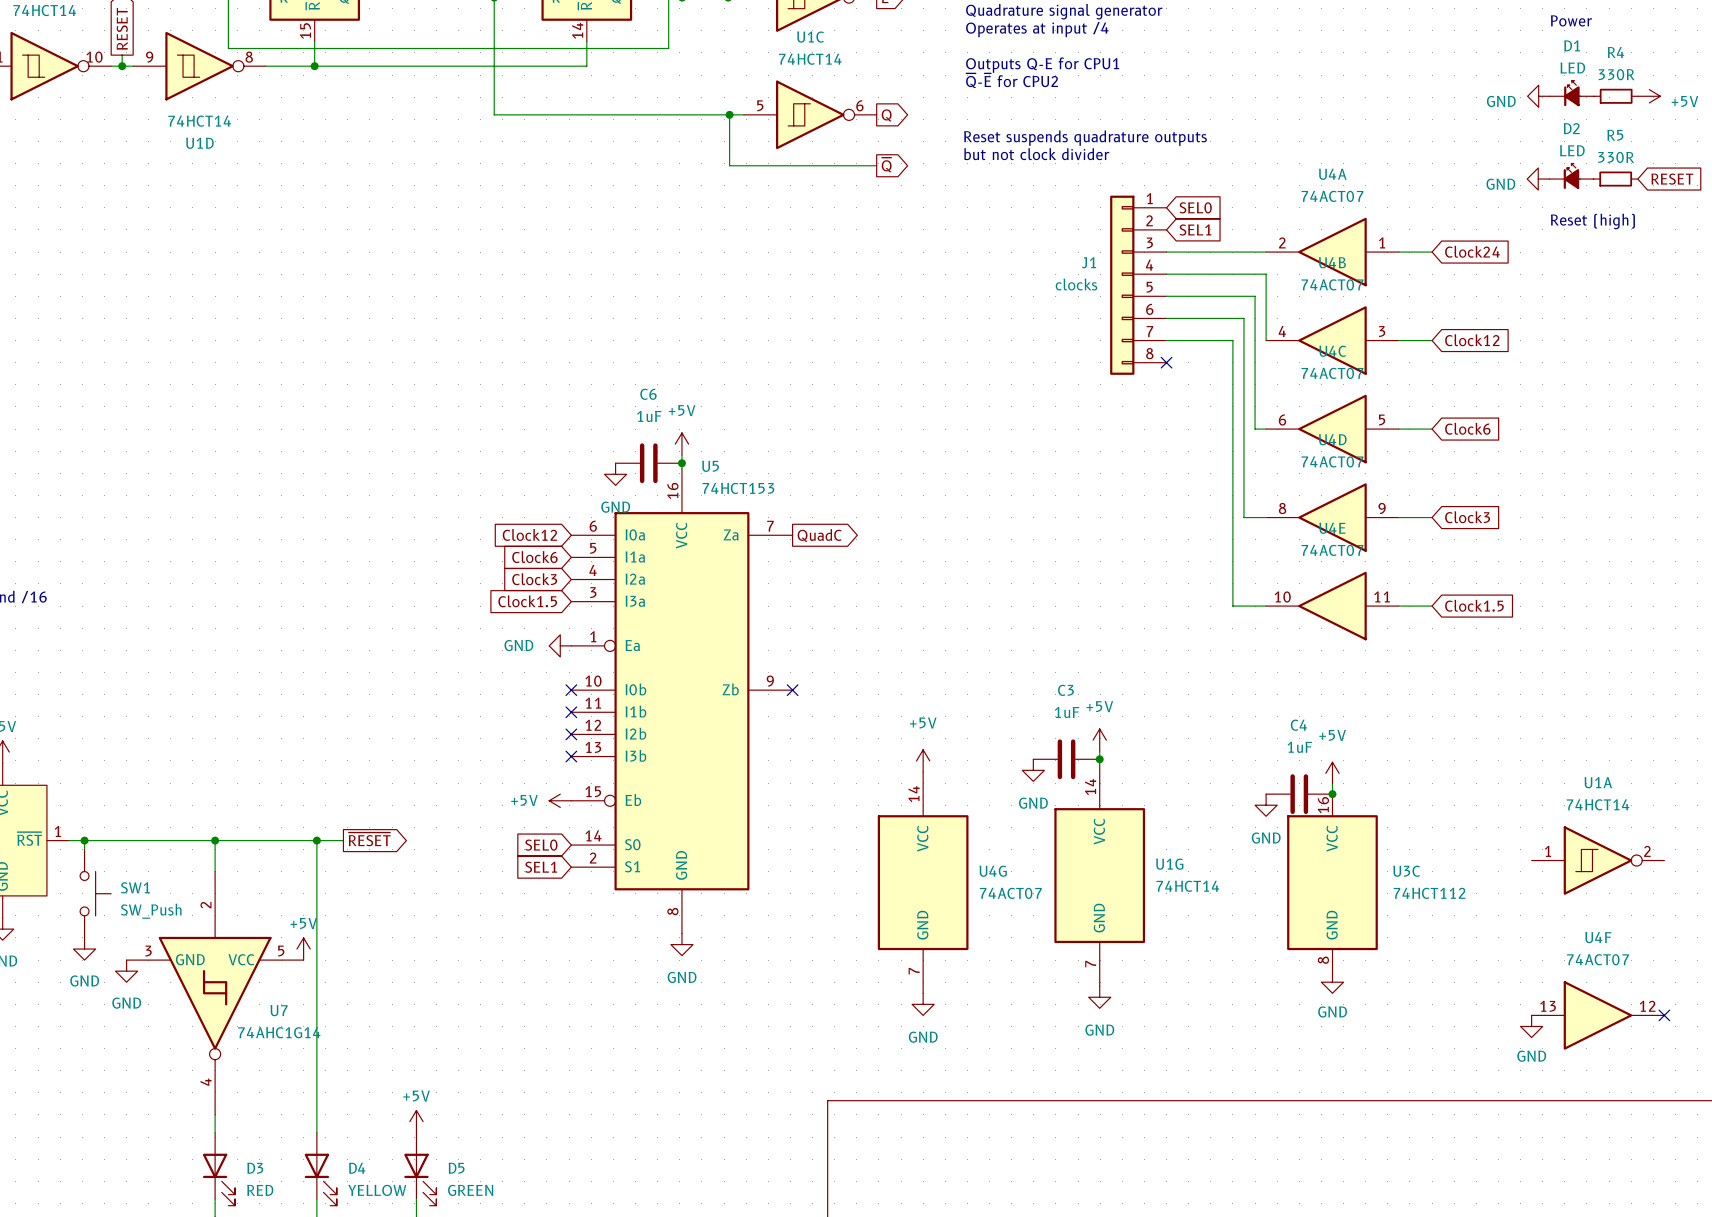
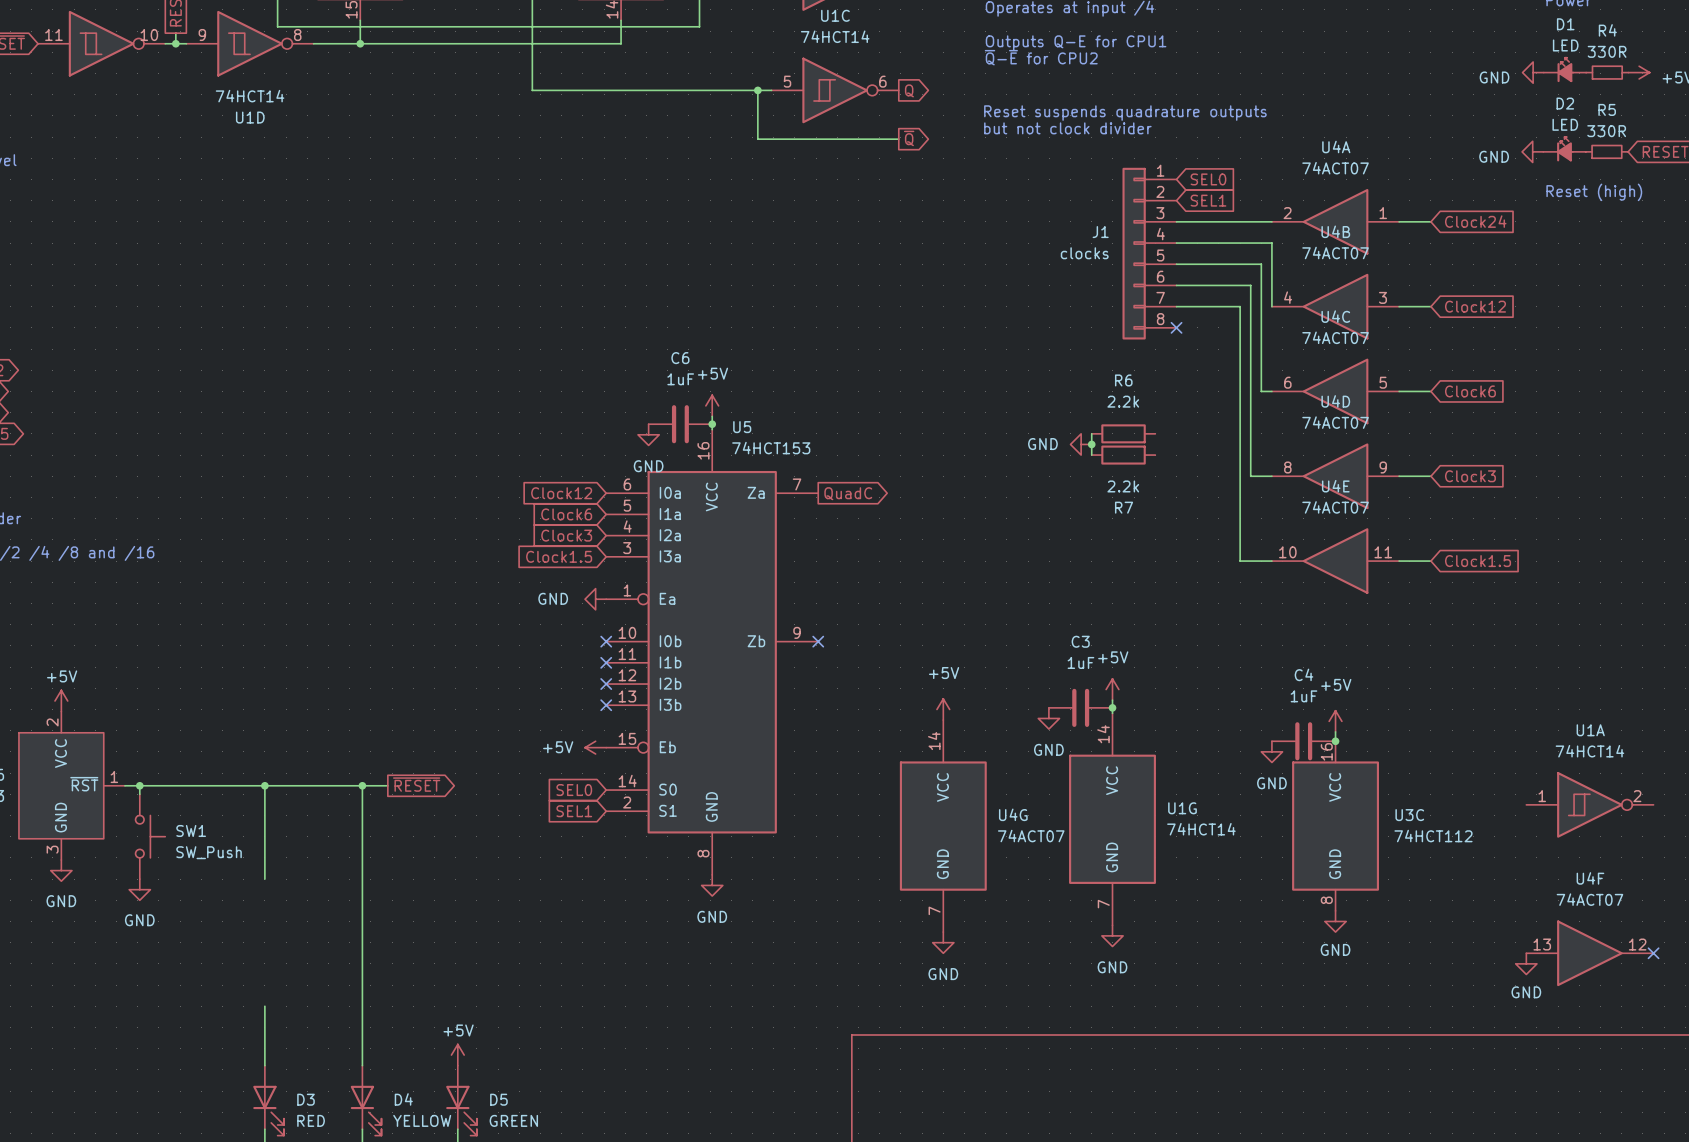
wire: none -> (1091, 433) (1091, 455)
R6: none -> 2.2k (1123, 433)
power symbol: none -> GND (1081, 444)
junction: none -> (1091, 444)
R7: none -> 2.2k (1123, 455)
power symbol: +5V (303, 949) -> none
power symbol: GND (126, 971) -> none
U7: 74AHC1G14 (215, 993) -> none

